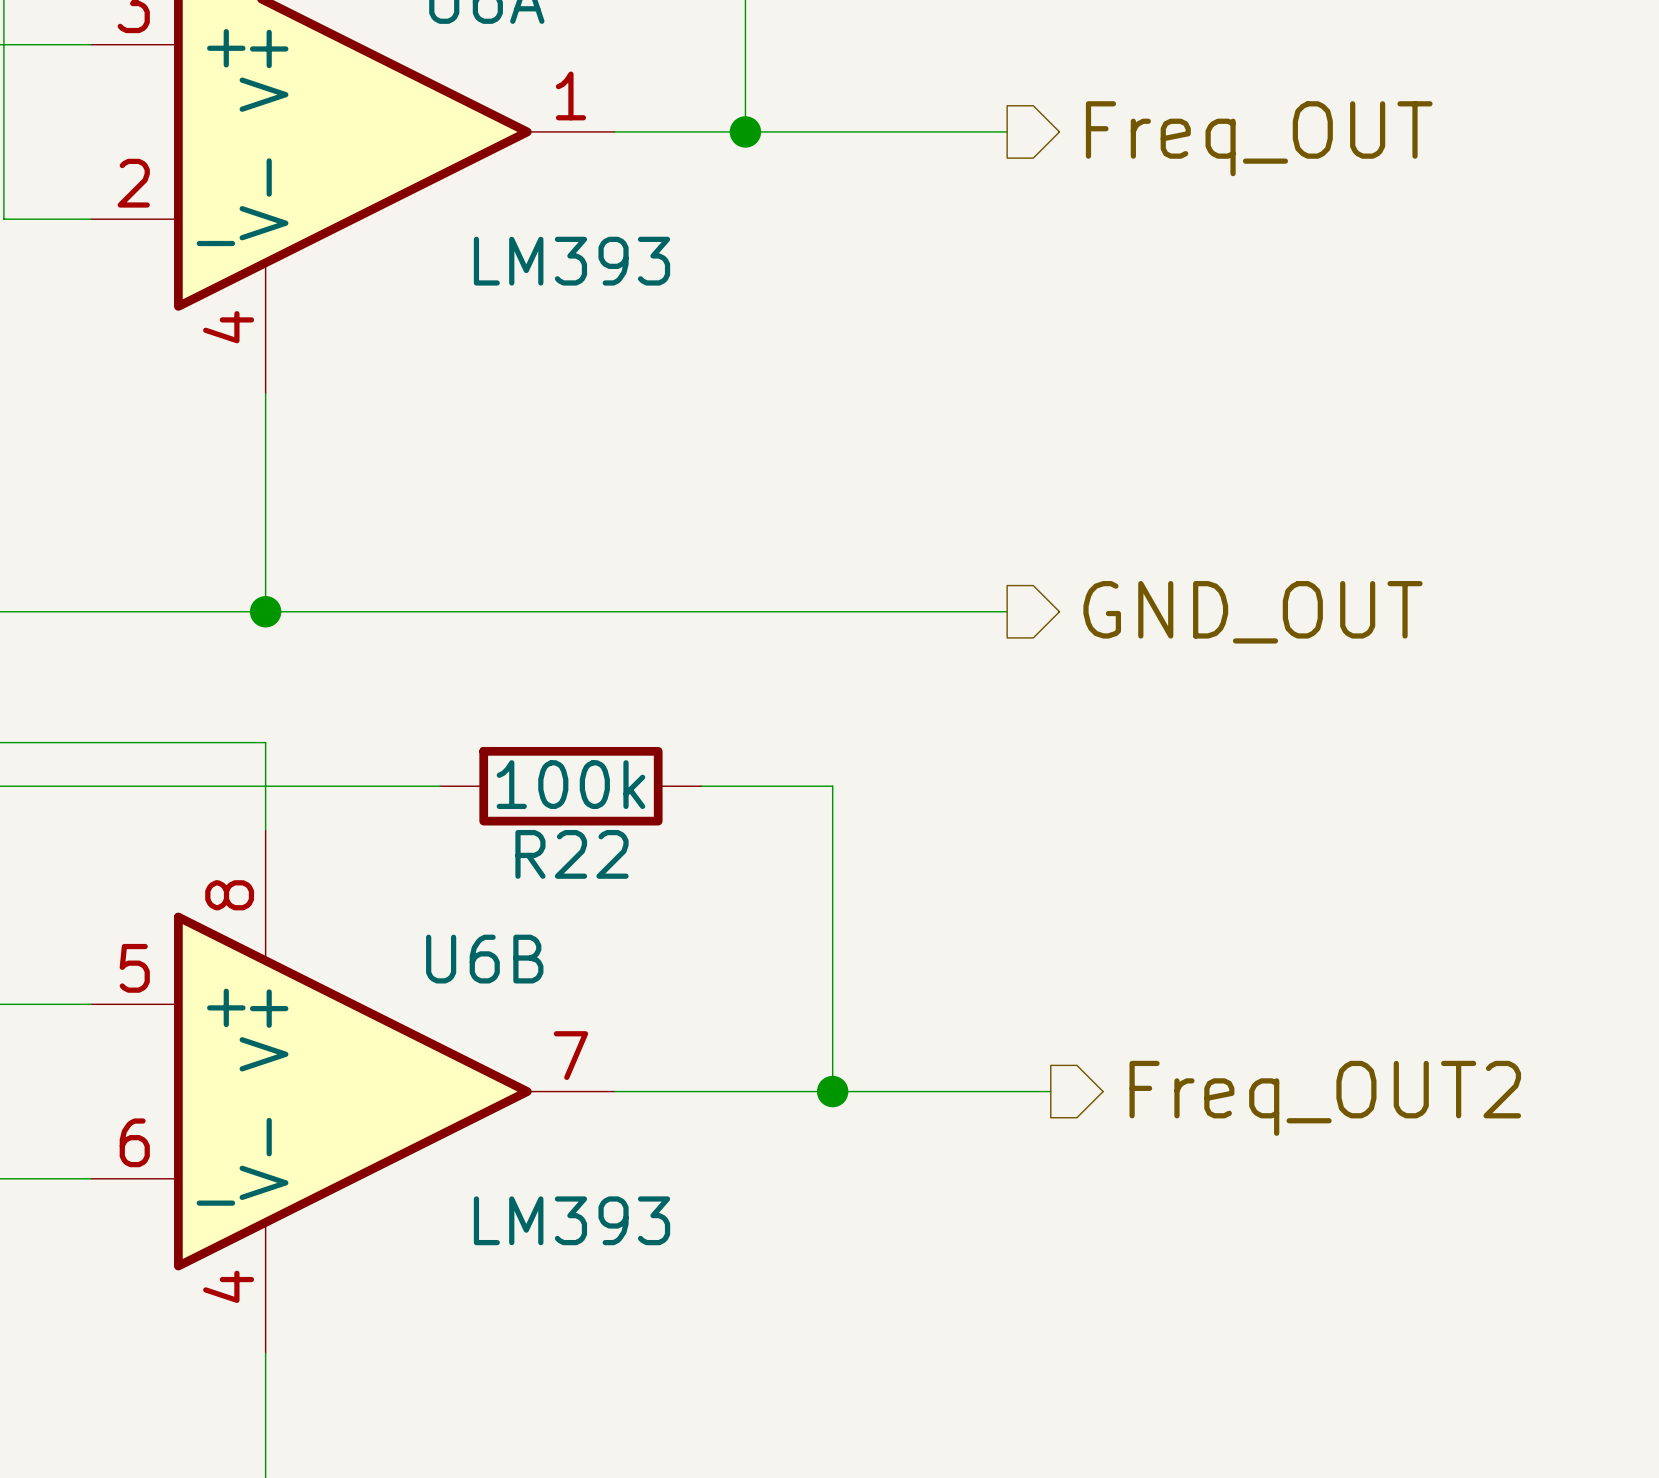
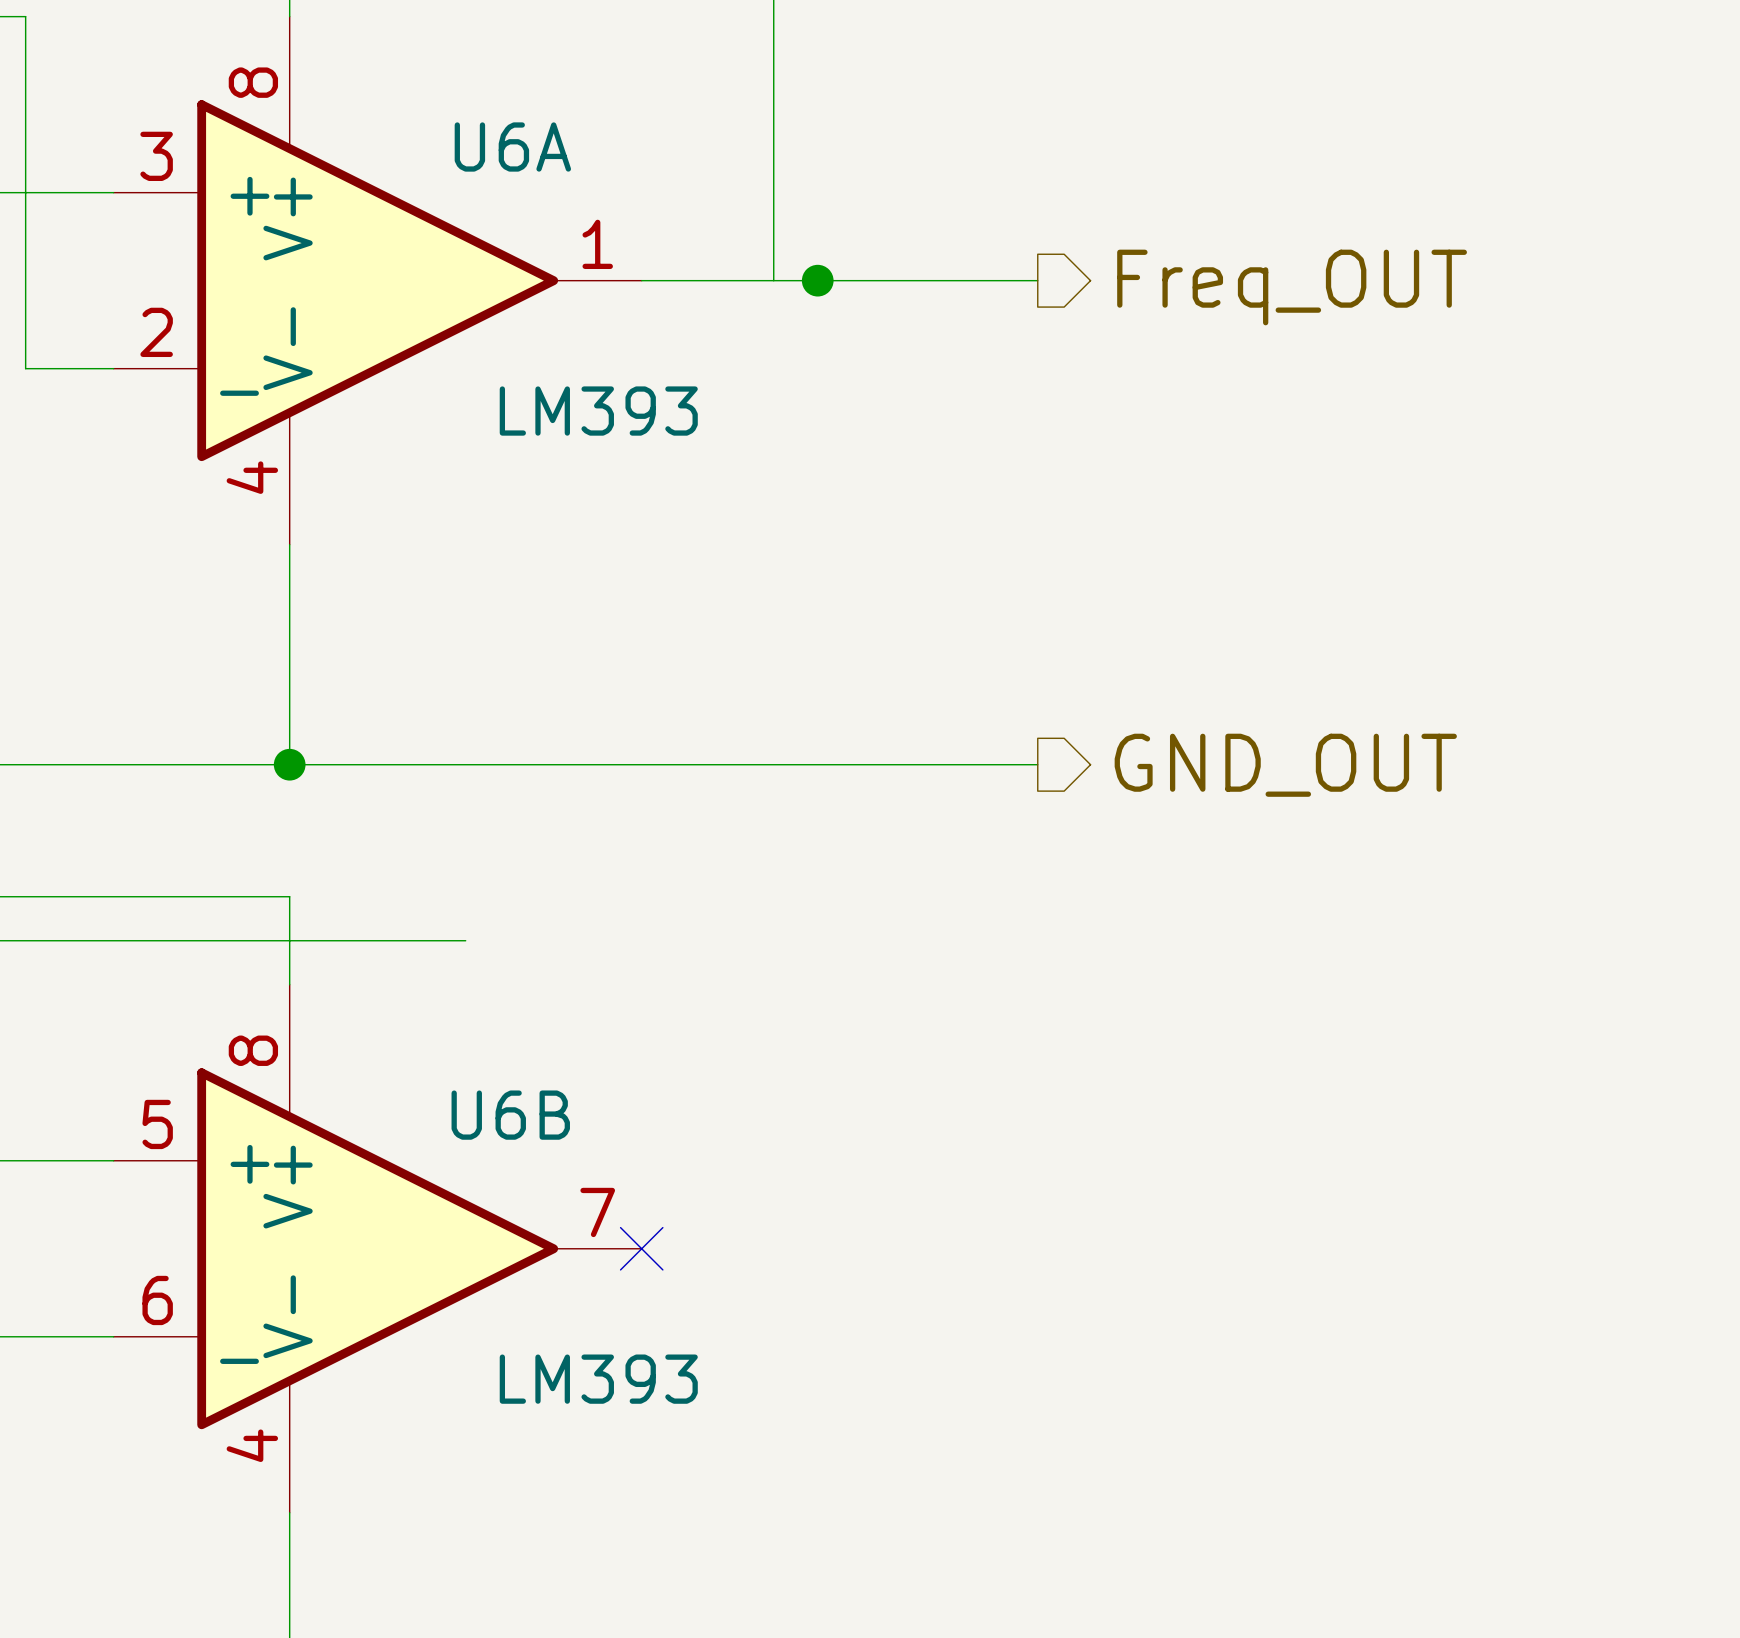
junction position: (745, 131) -> (817, 280)
R22: 100k (570, 786) -> none
wire: (701, 786) (832, 786) (832, 1091) -> none
wire: (614, 1091) (1050, 1091) -> none
no-connect mark: none -> (641, 1248)
junction: (832, 1091) -> none
hierarchical label: Freq_OUT2 (1325, 1098) -> none

